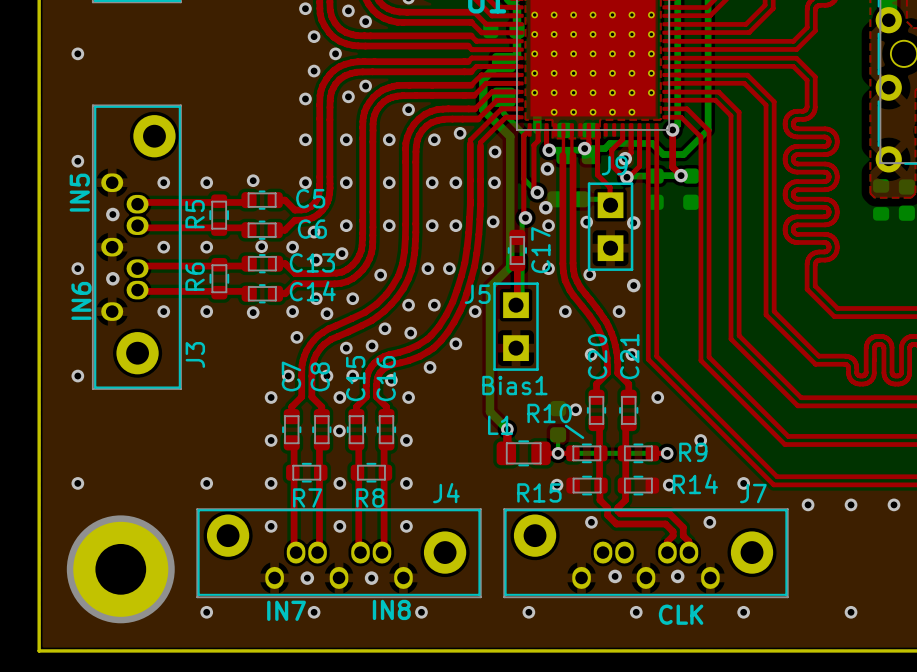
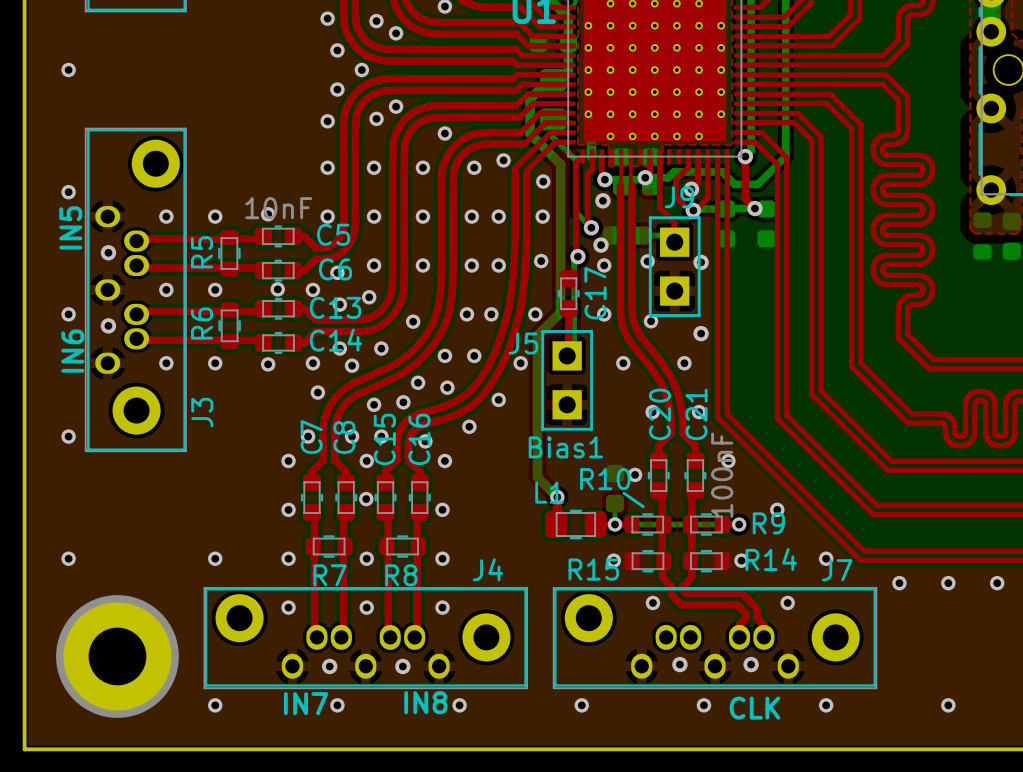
C5 value: none -> 10nF (278, 208)
C21 value: none -> 100nF (722, 475)

